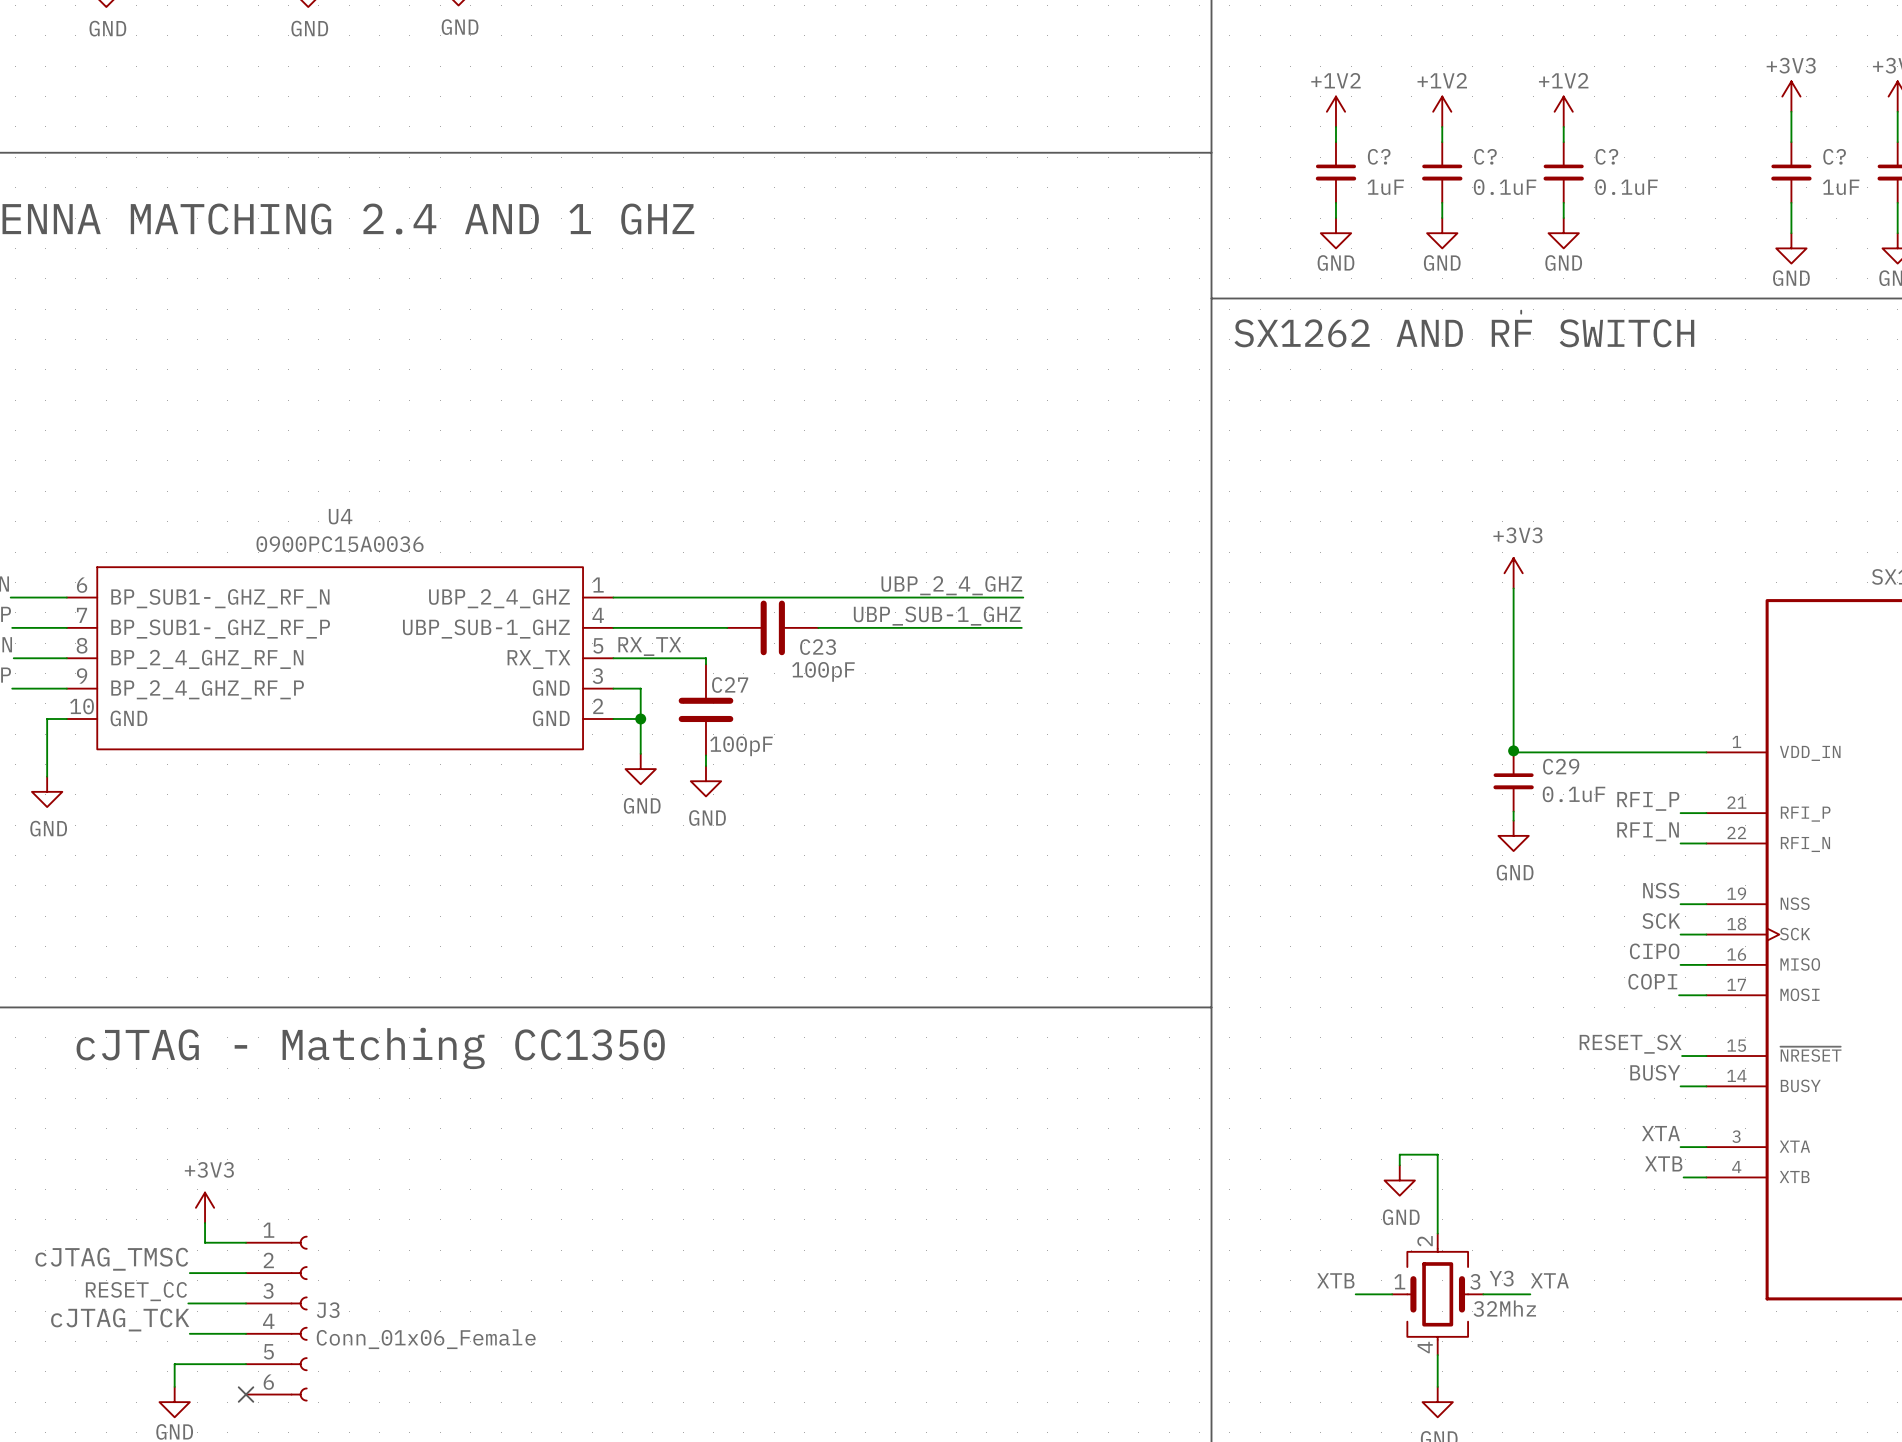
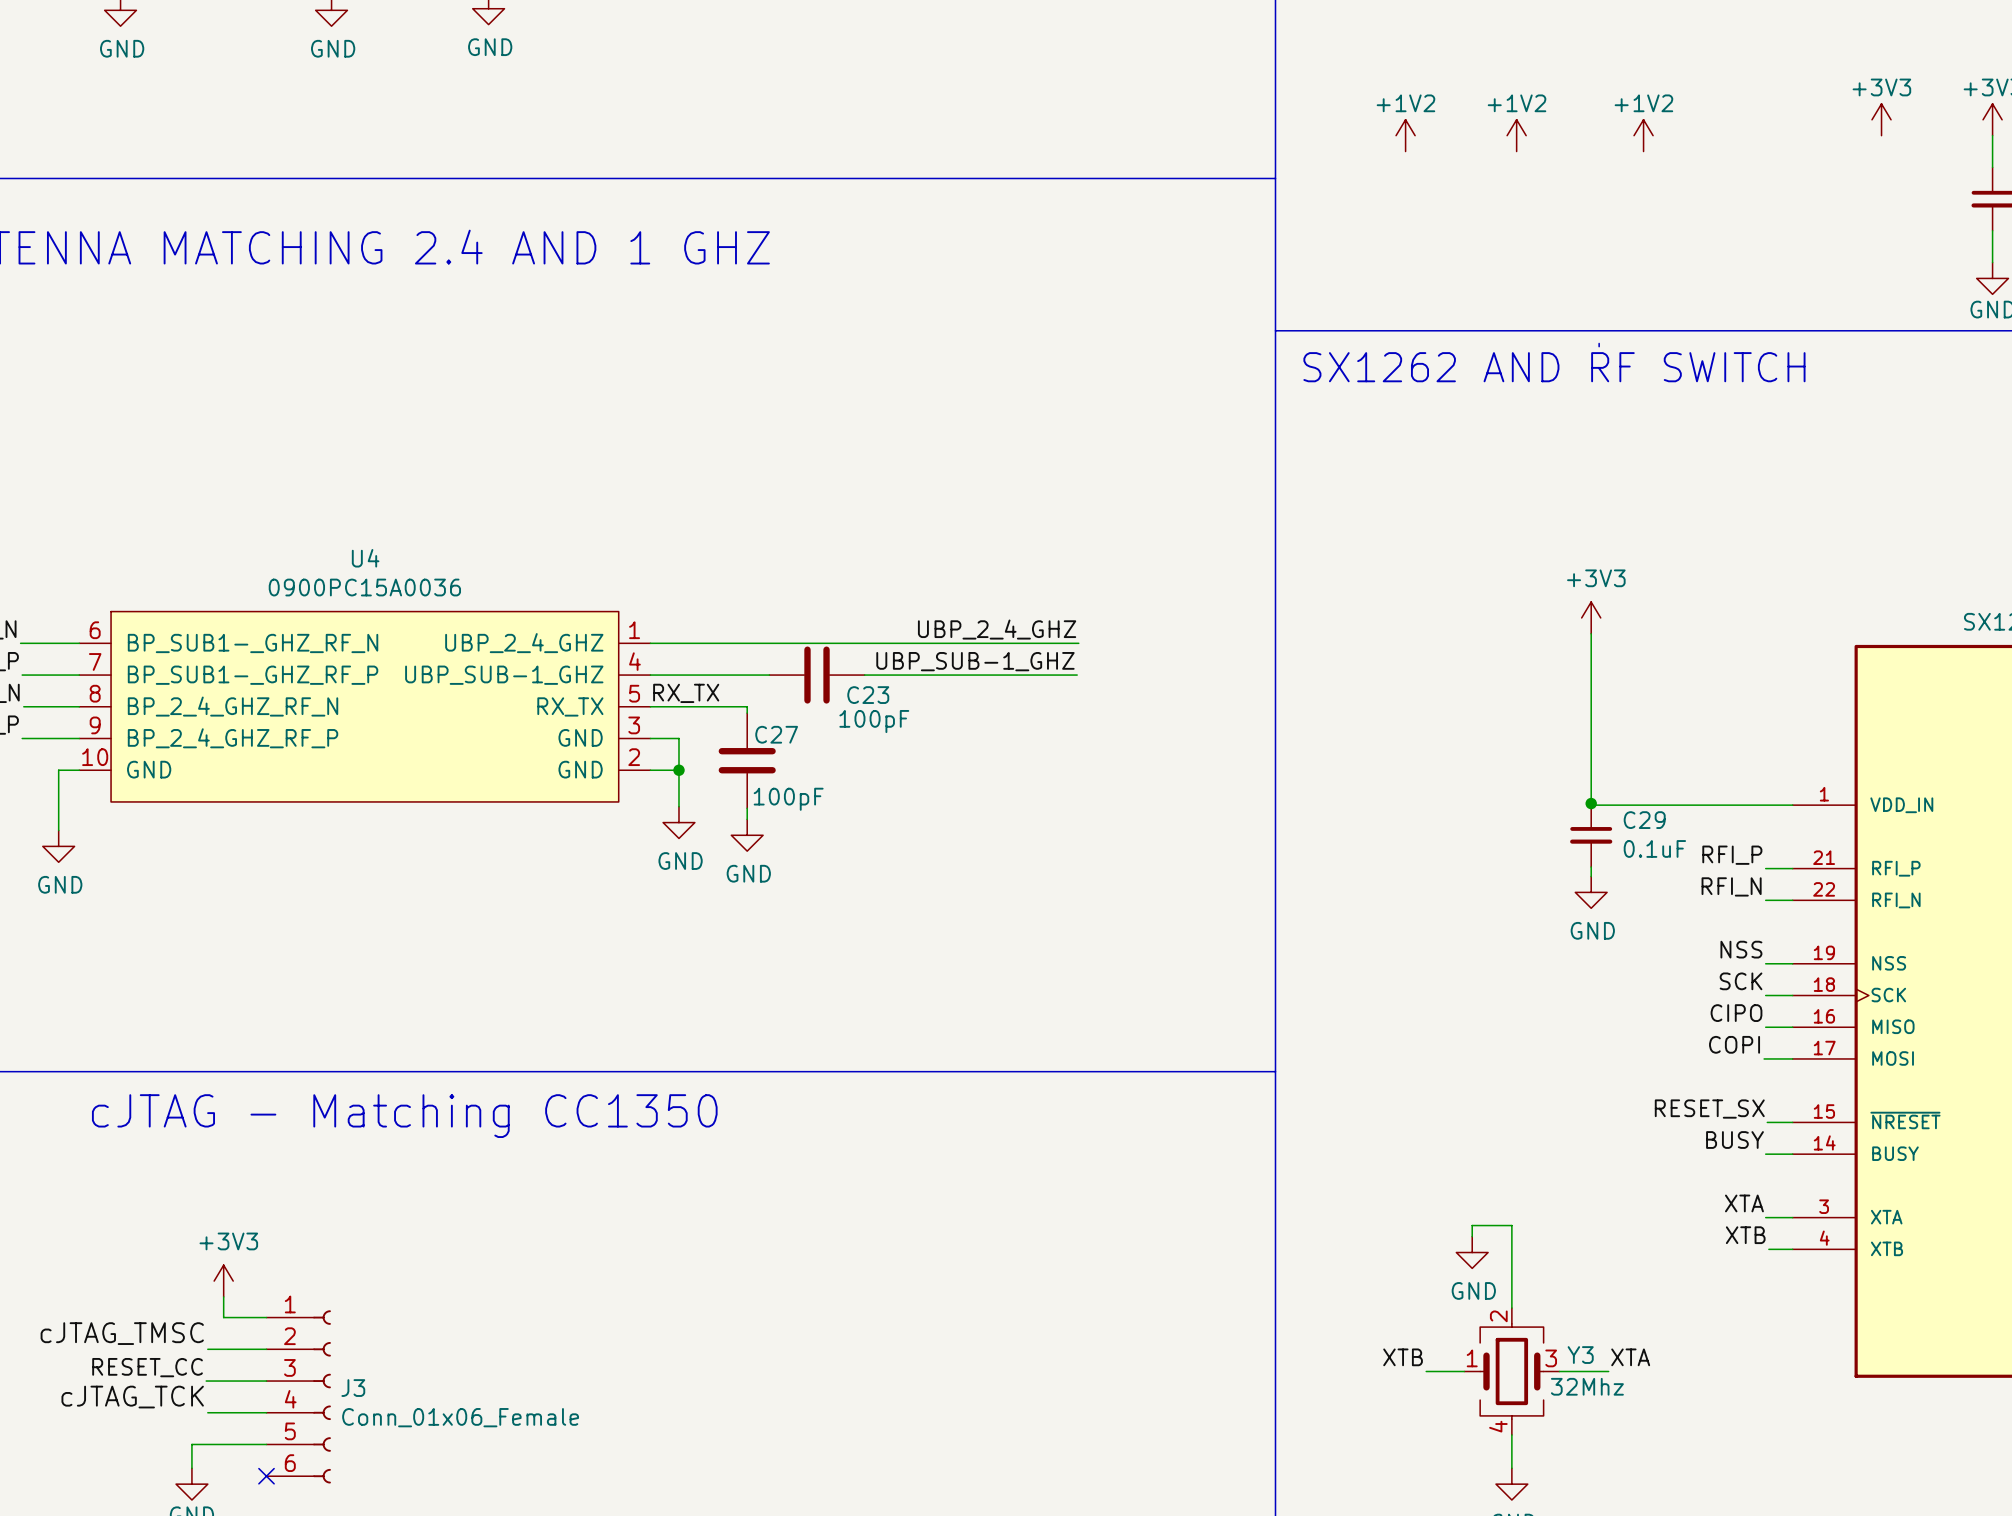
wire: (1791, 111) (1791, 142) -> none
wire: (1335, 126) (1335, 142) -> none
wire: (1442, 126) (1442, 142) -> none
wire: (1563, 126) (1563, 142) -> none
C?: 1uF (1335, 172) -> none
C?: 0.1uF (1442, 172) -> none
C?: 0.1uF (1563, 172) -> none
C?: 1uF (1791, 172) -> none
wire: (1335, 202) (1335, 218) -> none
wire: (1442, 202) (1442, 218) -> none
wire: (1563, 202) (1563, 218) -> none
wire: (1791, 202) (1791, 233) -> none
power symbol: GND (1335, 233) -> none
power symbol: GND (1442, 233) -> none
power symbol: GND (1563, 233) -> none
power symbol: GND (1791, 248) -> none

